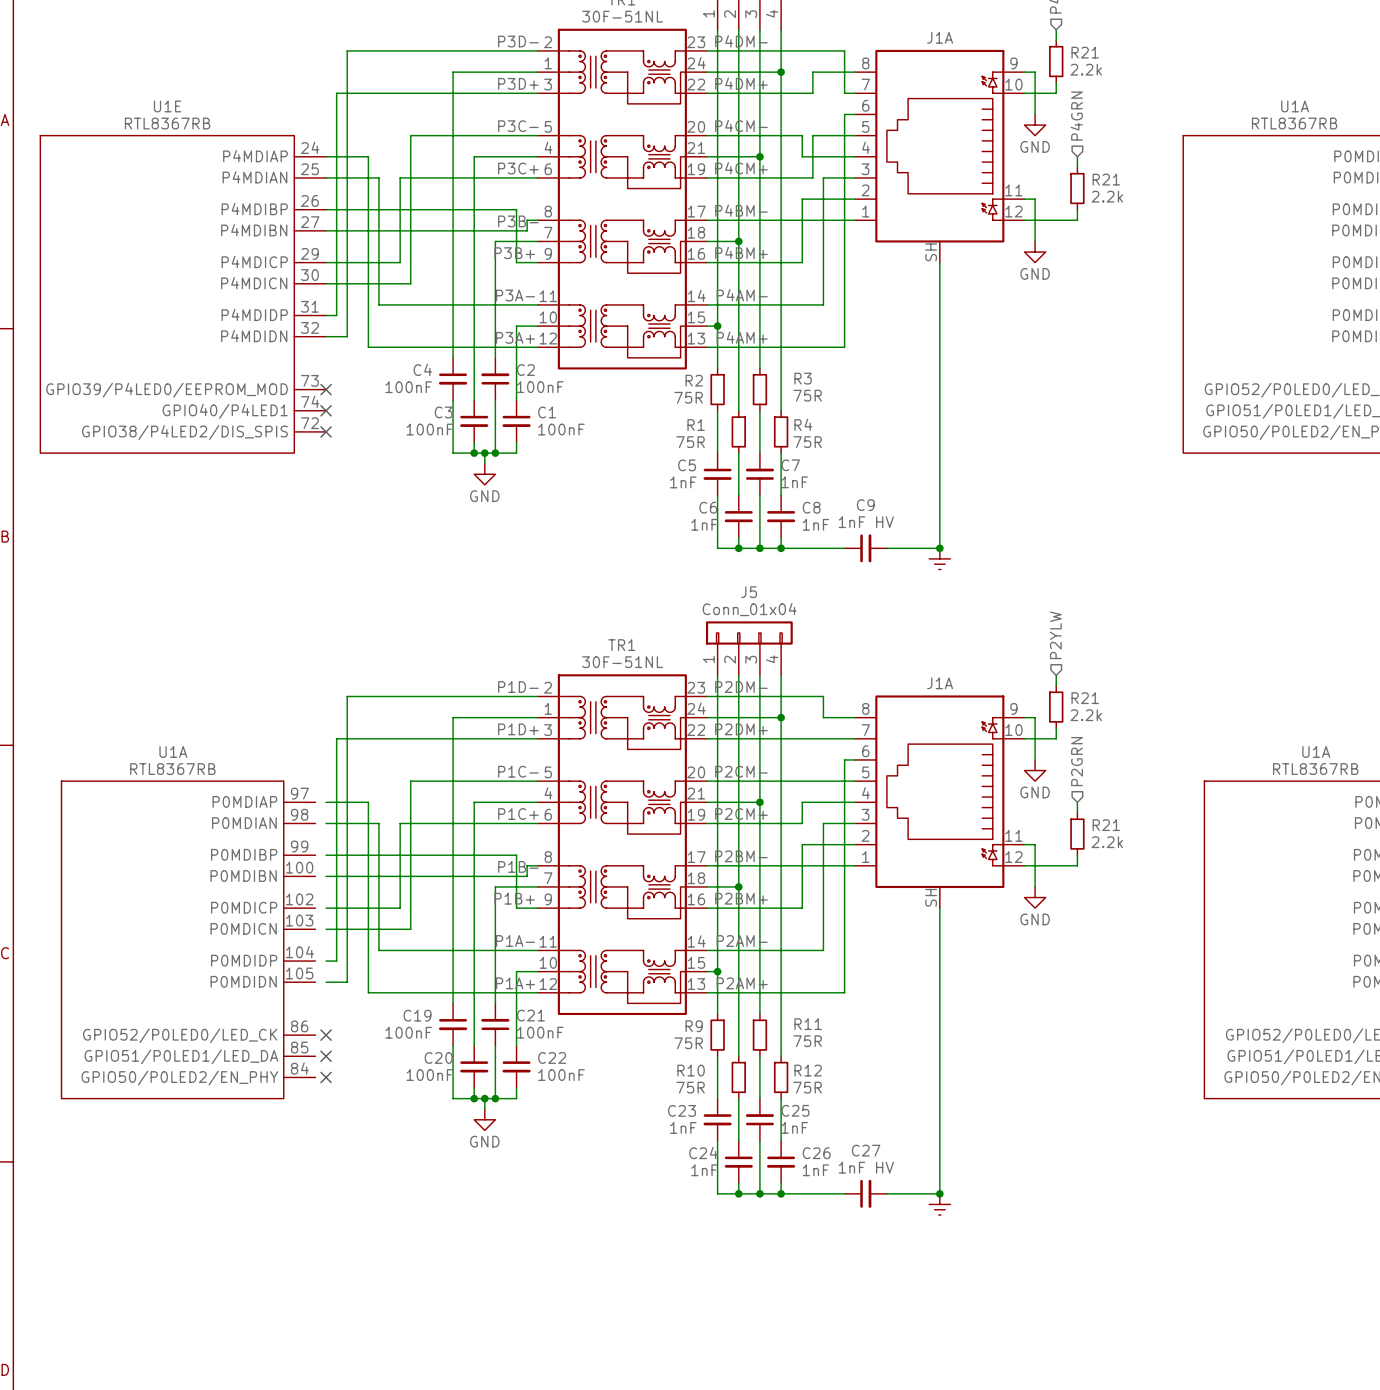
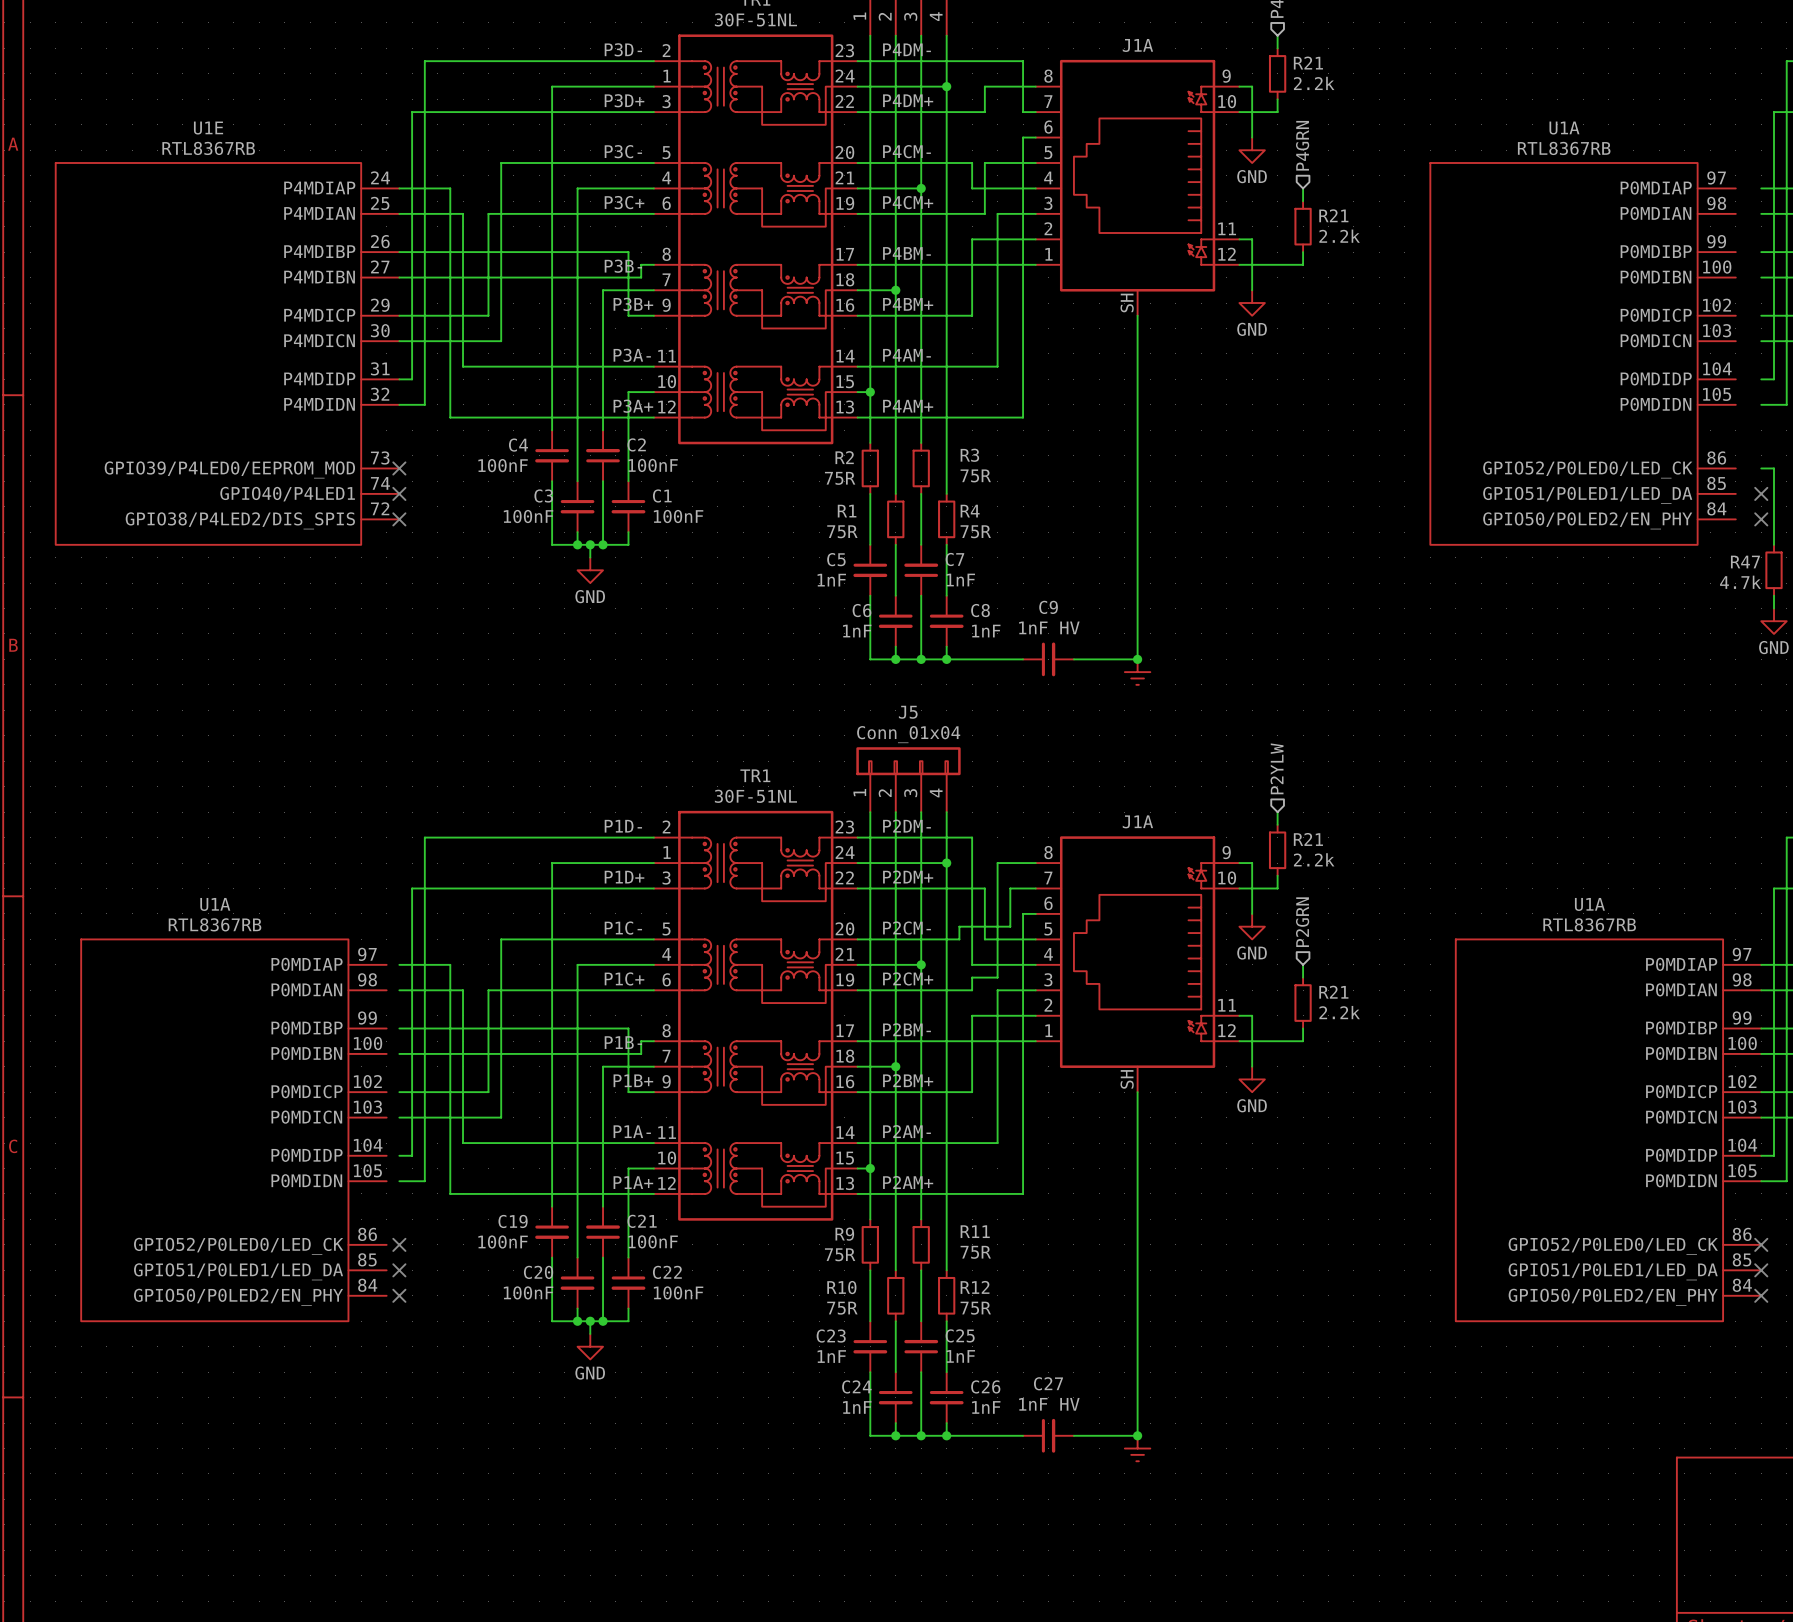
wire: (802, 696) (823, 696) (823, 717) -> (972, 837) (972, 964)
wire: (812, 738) (834, 738) -> (984, 888) (984, 939)
wire: (791, 781) (812, 781) -> (959, 939) (959, 926) (1010, 926) (1010, 888)
wire: (802, 802) (802, 812) -> (997, 863) (997, 977) (972, 977)

